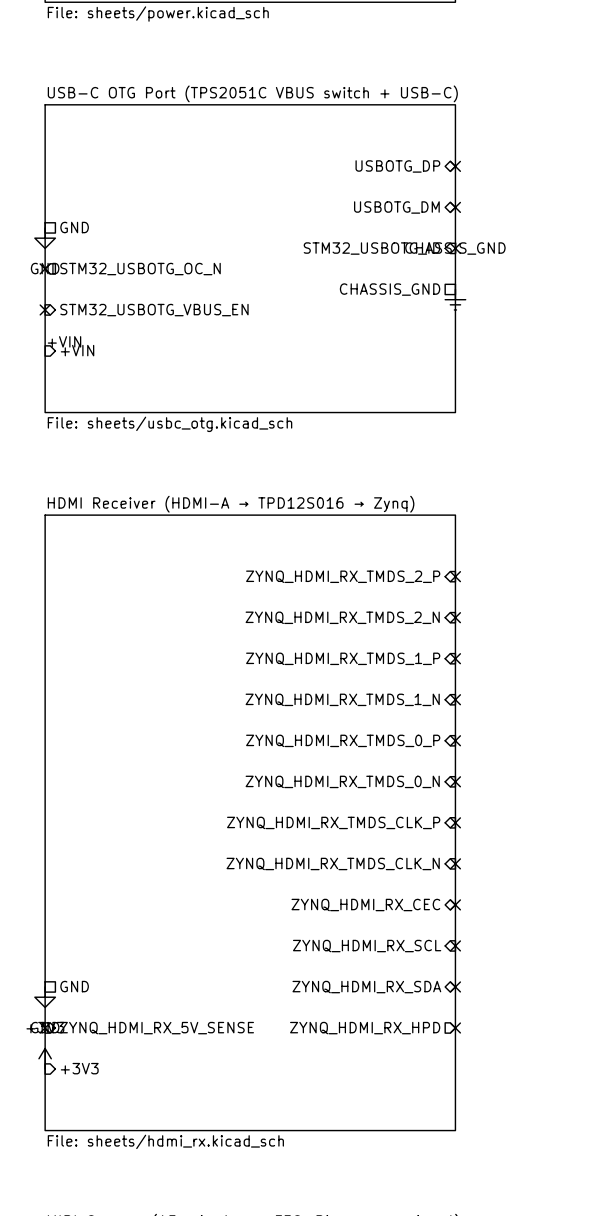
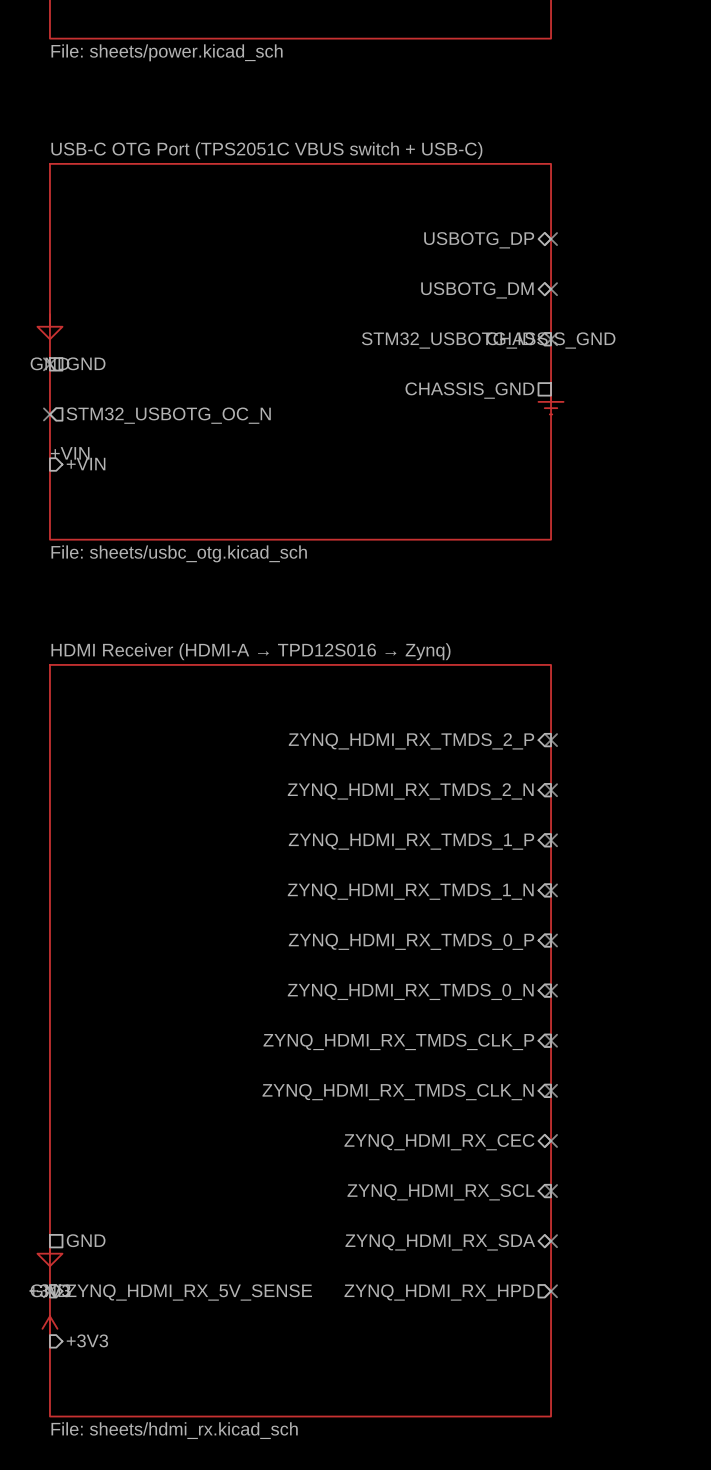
sheet pin: GND (74, 227) -> none
sheet pin shape: output (140, 269) -> passive (86, 363)
sheet pin: STM32_USBOTG_OC_N (140, 269) -> GND (86, 363)
sheet pin shape: input (154, 310) -> output (168, 415)
sheet pin: STM32_USBOTG_VBUS_EN (154, 310) -> STM32_USBOTG_OC_N (168, 415)

